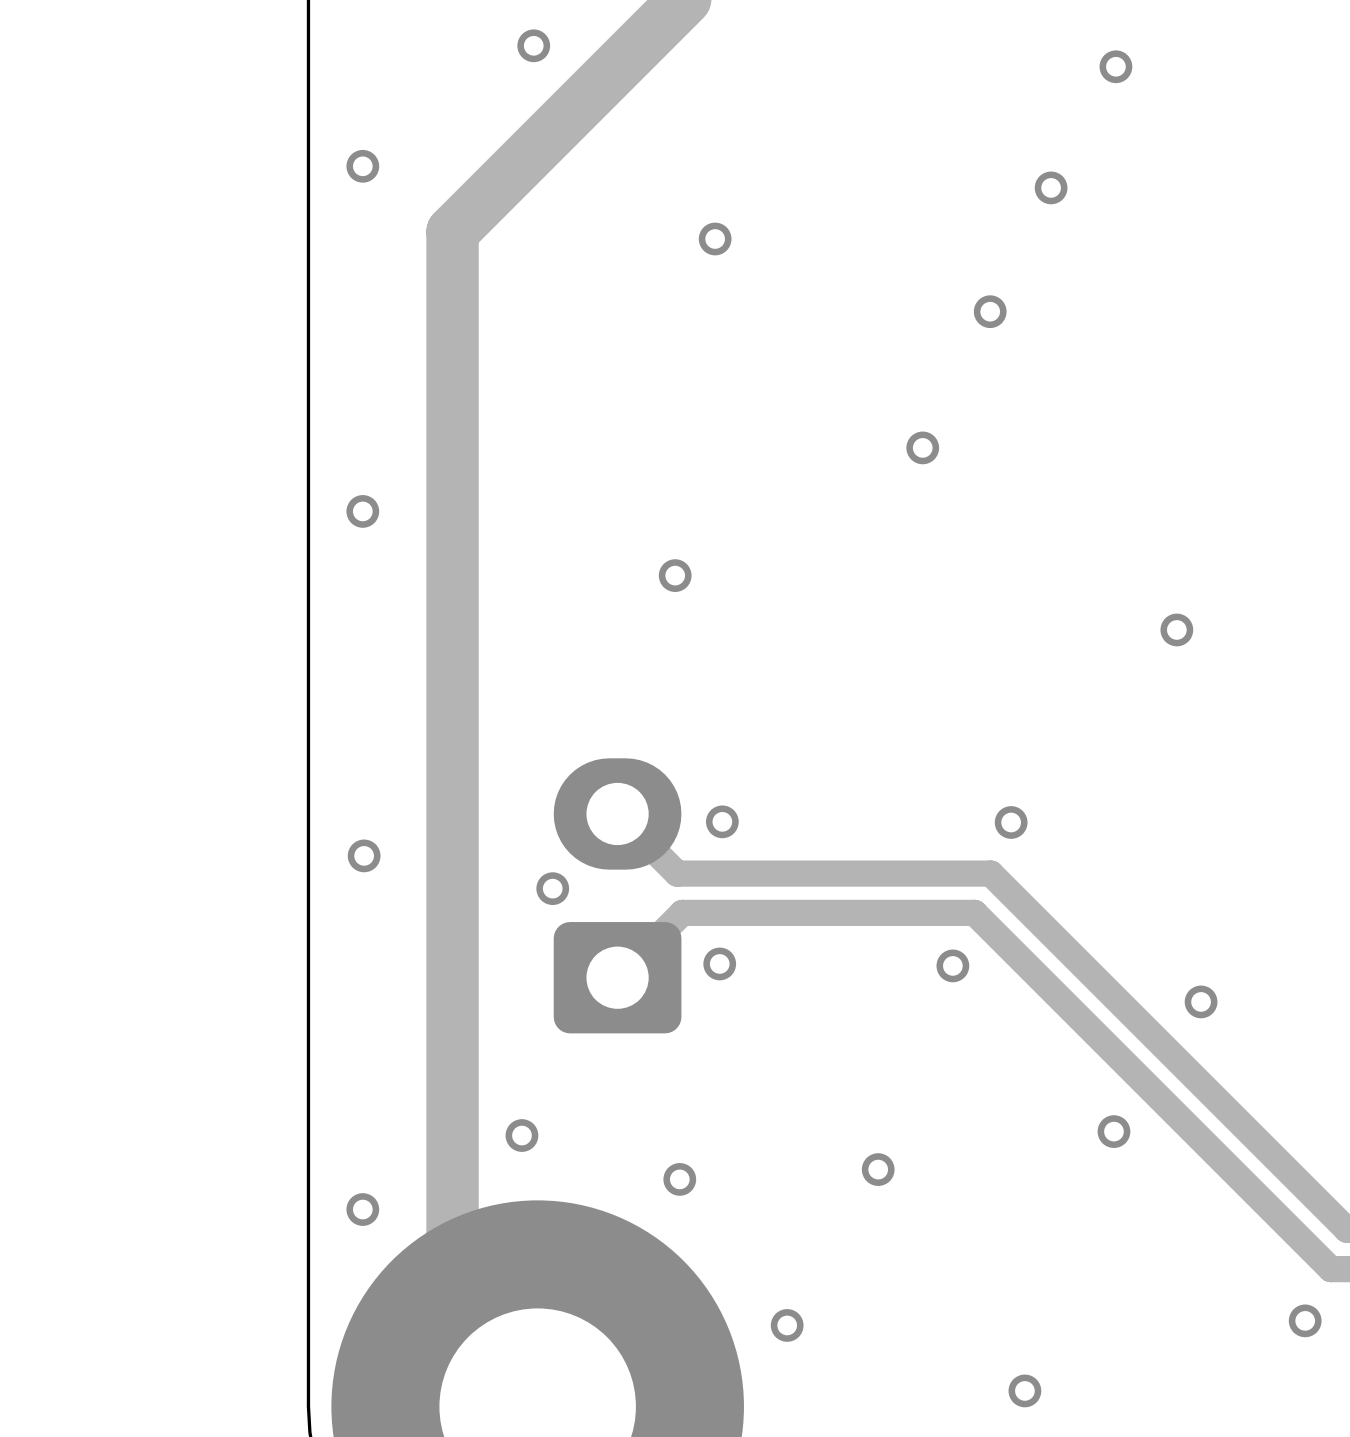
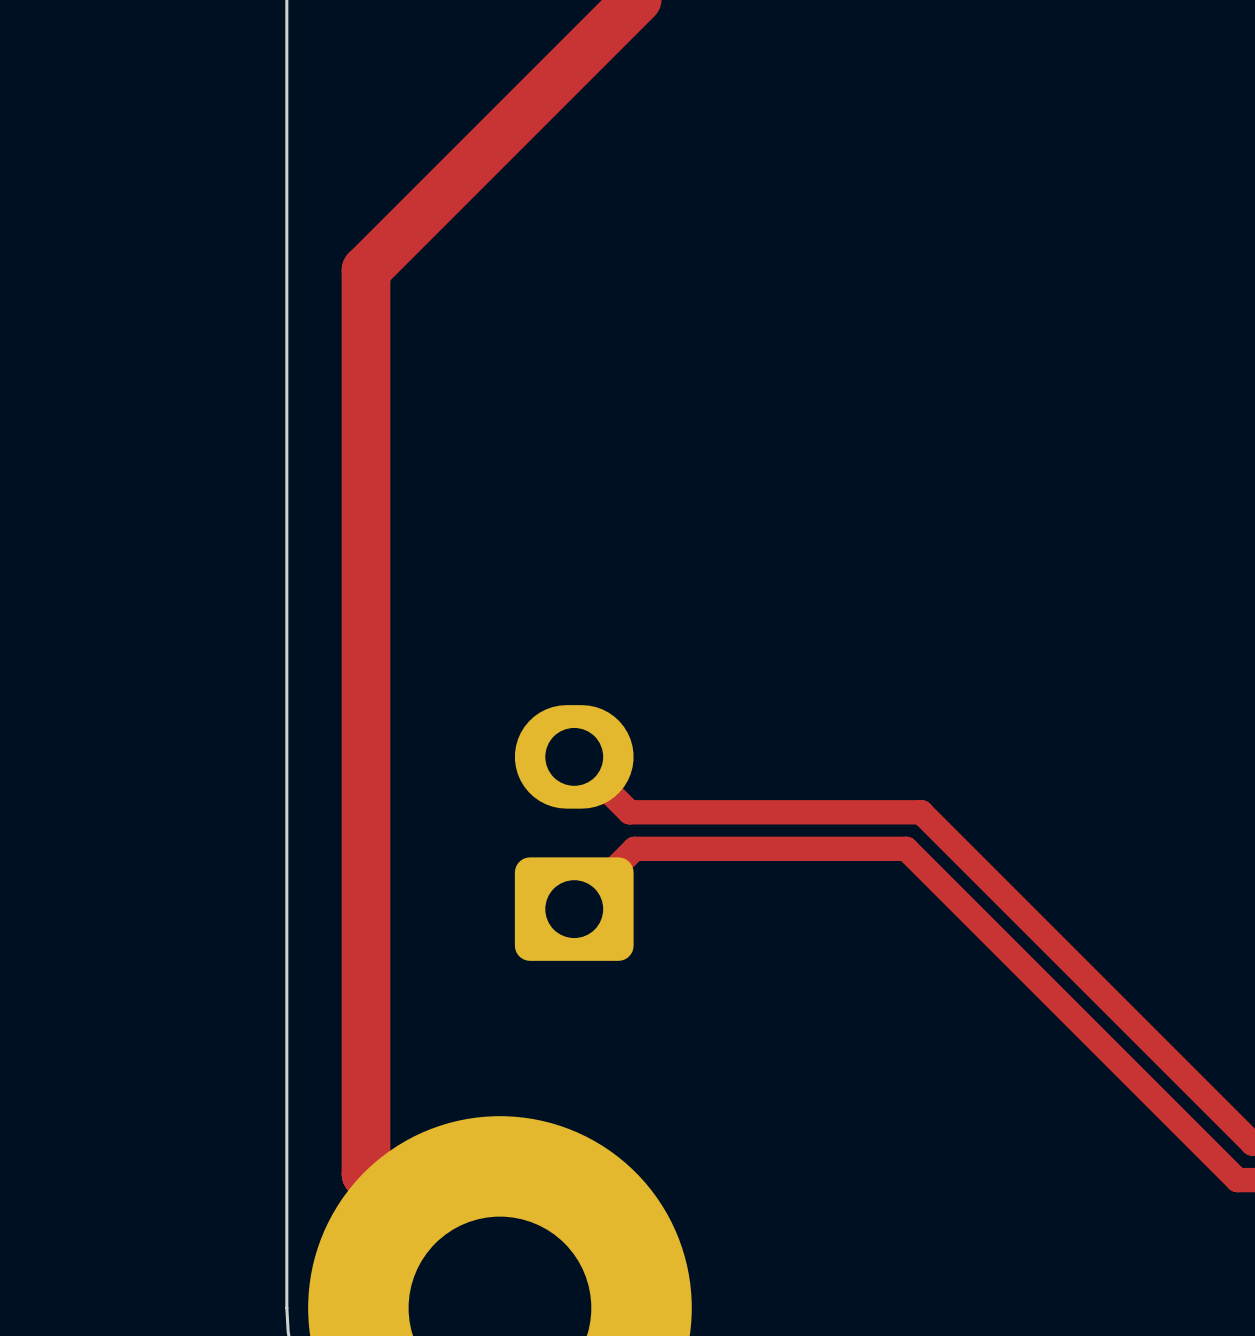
via: (533, 45) -> none
via: (1115, 66) -> none
via: (362, 166) -> none
via: (1051, 187) -> none
track: (452, 231) (452, 1321) -> (420, 215) (365, 270) (365, 1174) (420, 1228)
via: (715, 238) -> none
via: (990, 311) -> none
via: (922, 447) -> none
via: (362, 511) -> none
via: (675, 575) -> none
via: (1176, 629) -> none
via: (722, 821) -> none
via: (1011, 822) -> none
via: (364, 855) -> none
via: (552, 888) -> none
via: (719, 963) -> none
via: (952, 965) -> none
via: (1201, 1001) -> none
via: (1113, 1131) -> none
via: (521, 1135) -> none
via: (878, 1169) -> none
via: (679, 1179) -> none
via: (362, 1209) -> none
via: (1305, 1320) -> none
via: (787, 1325) -> none
via: (1024, 1390) -> none

